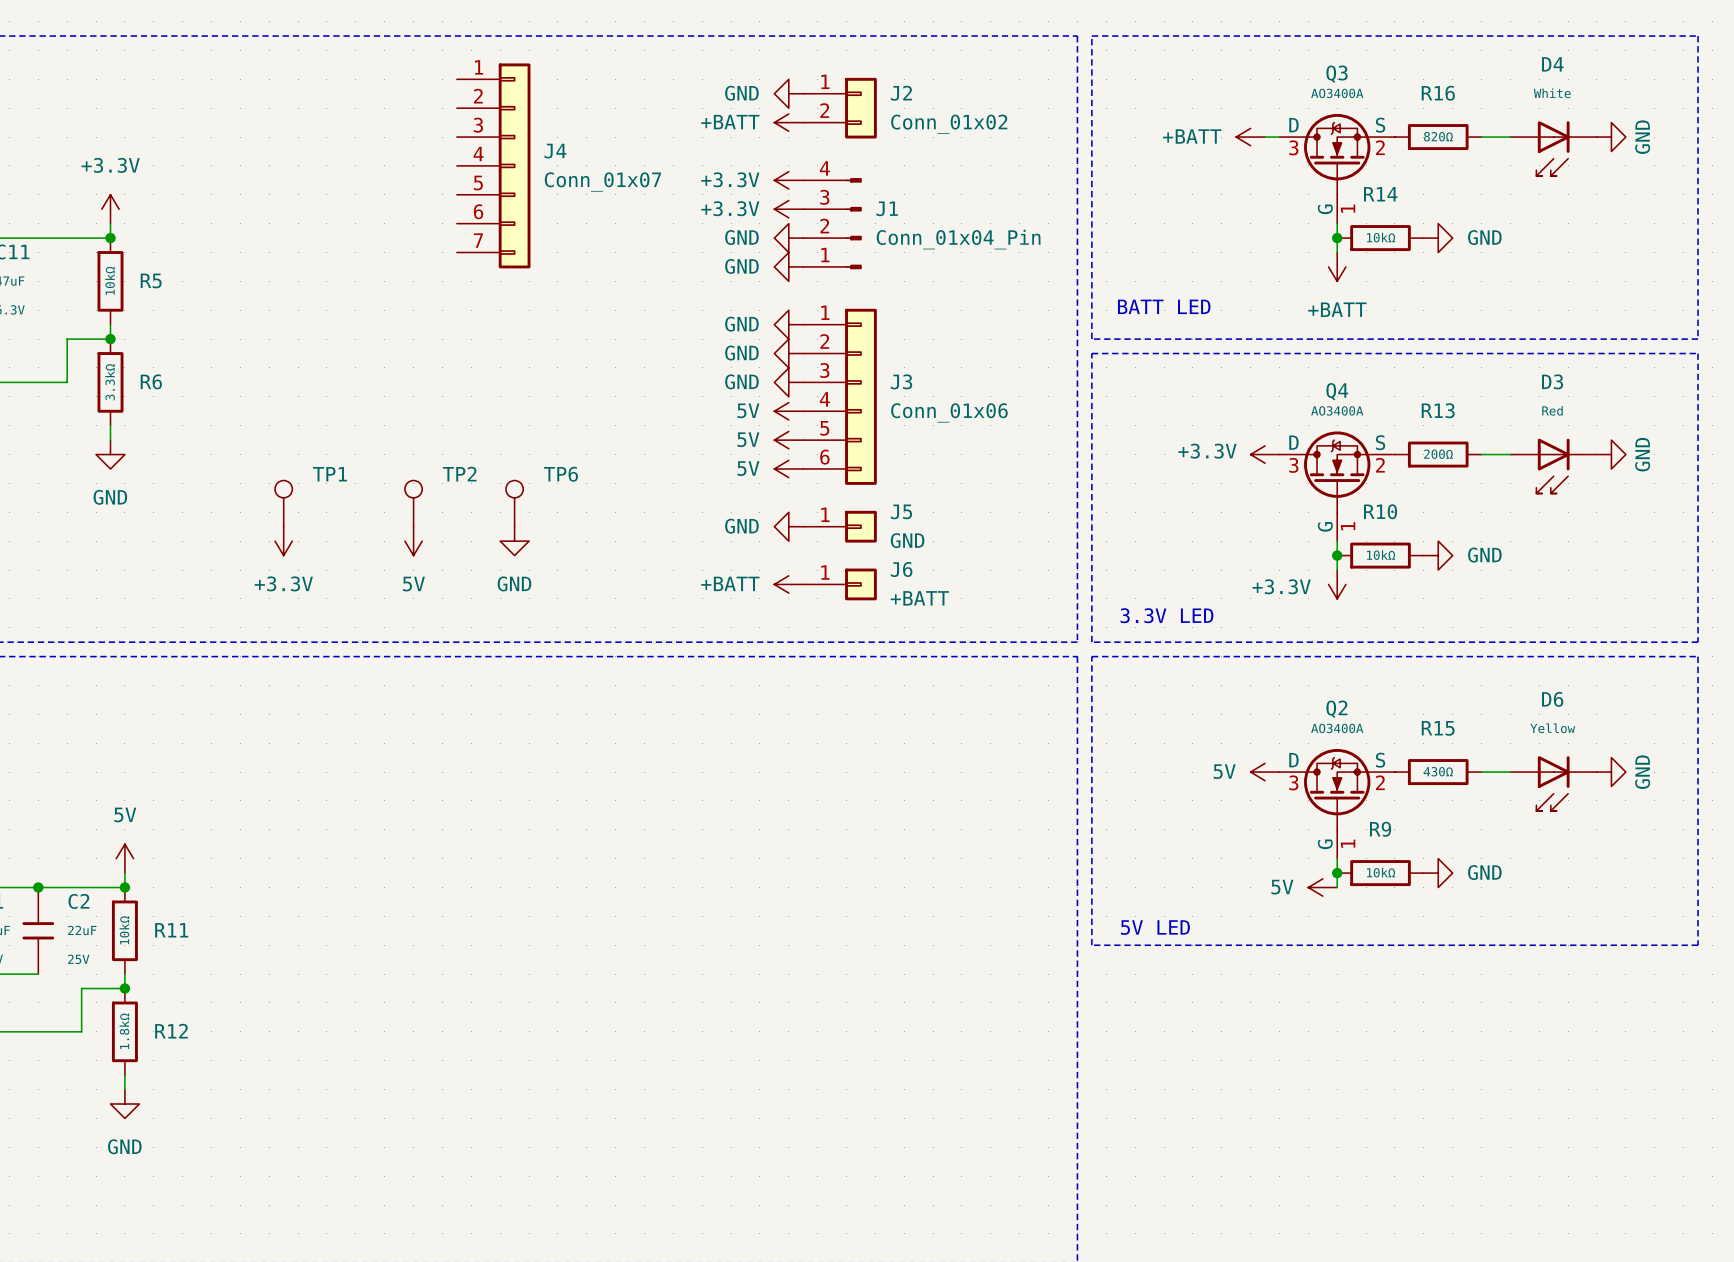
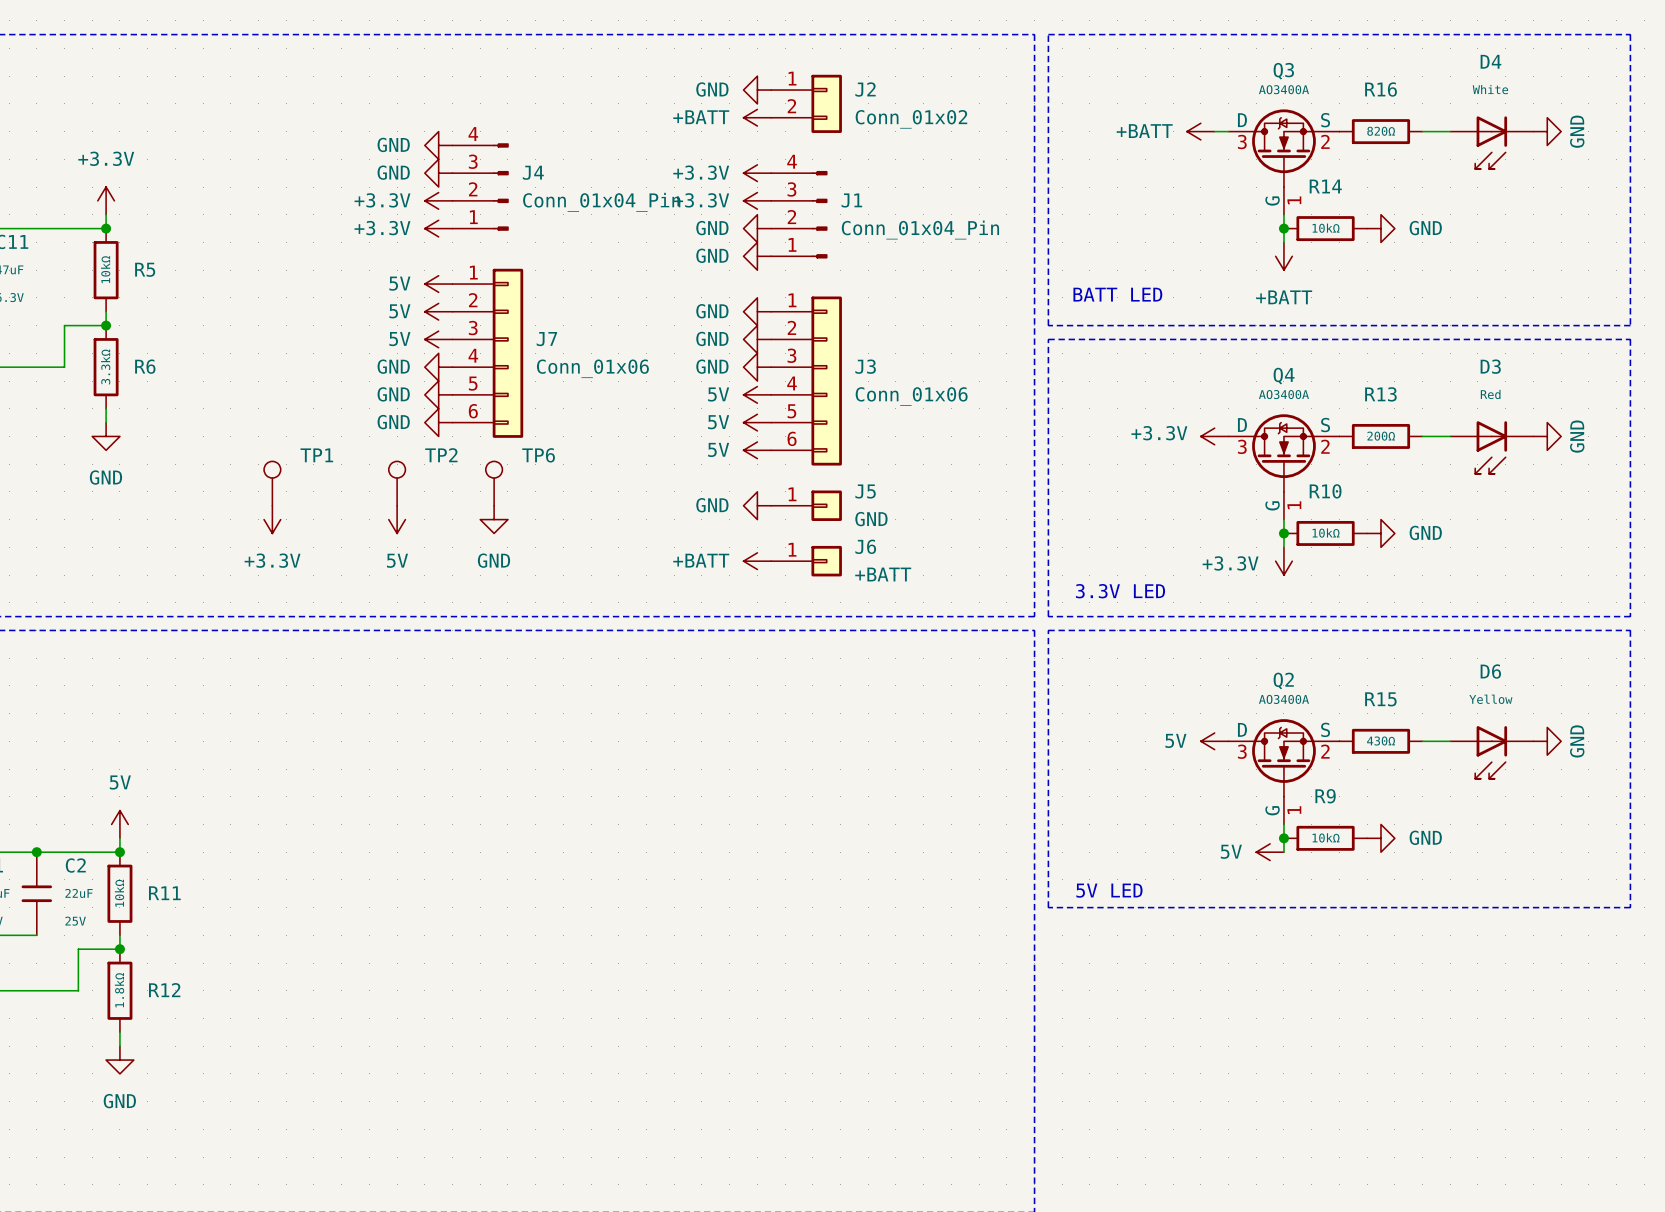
J4 symbol: [456, 63, 531, 269] -> [452, 143, 509, 231]
power symbol: none -> GND (438, 145)
power symbol: none -> GND (438, 173)
J4 value: Conn_01x07 (602, 182) -> Conn_01x04_Pin (601, 202)
power symbol: none -> +3.3V (438, 200)
power symbol: none -> +3.3V (438, 228)
power symbol: none -> 5V (438, 284)
power symbol: none -> 5V (438, 311)
power symbol: none -> 5V (438, 339)
J7: none -> Conn_01x06 (487, 353)
power symbol: none -> GND (438, 367)
power symbol: none -> GND (438, 394)
power symbol: none -> GND (438, 422)

